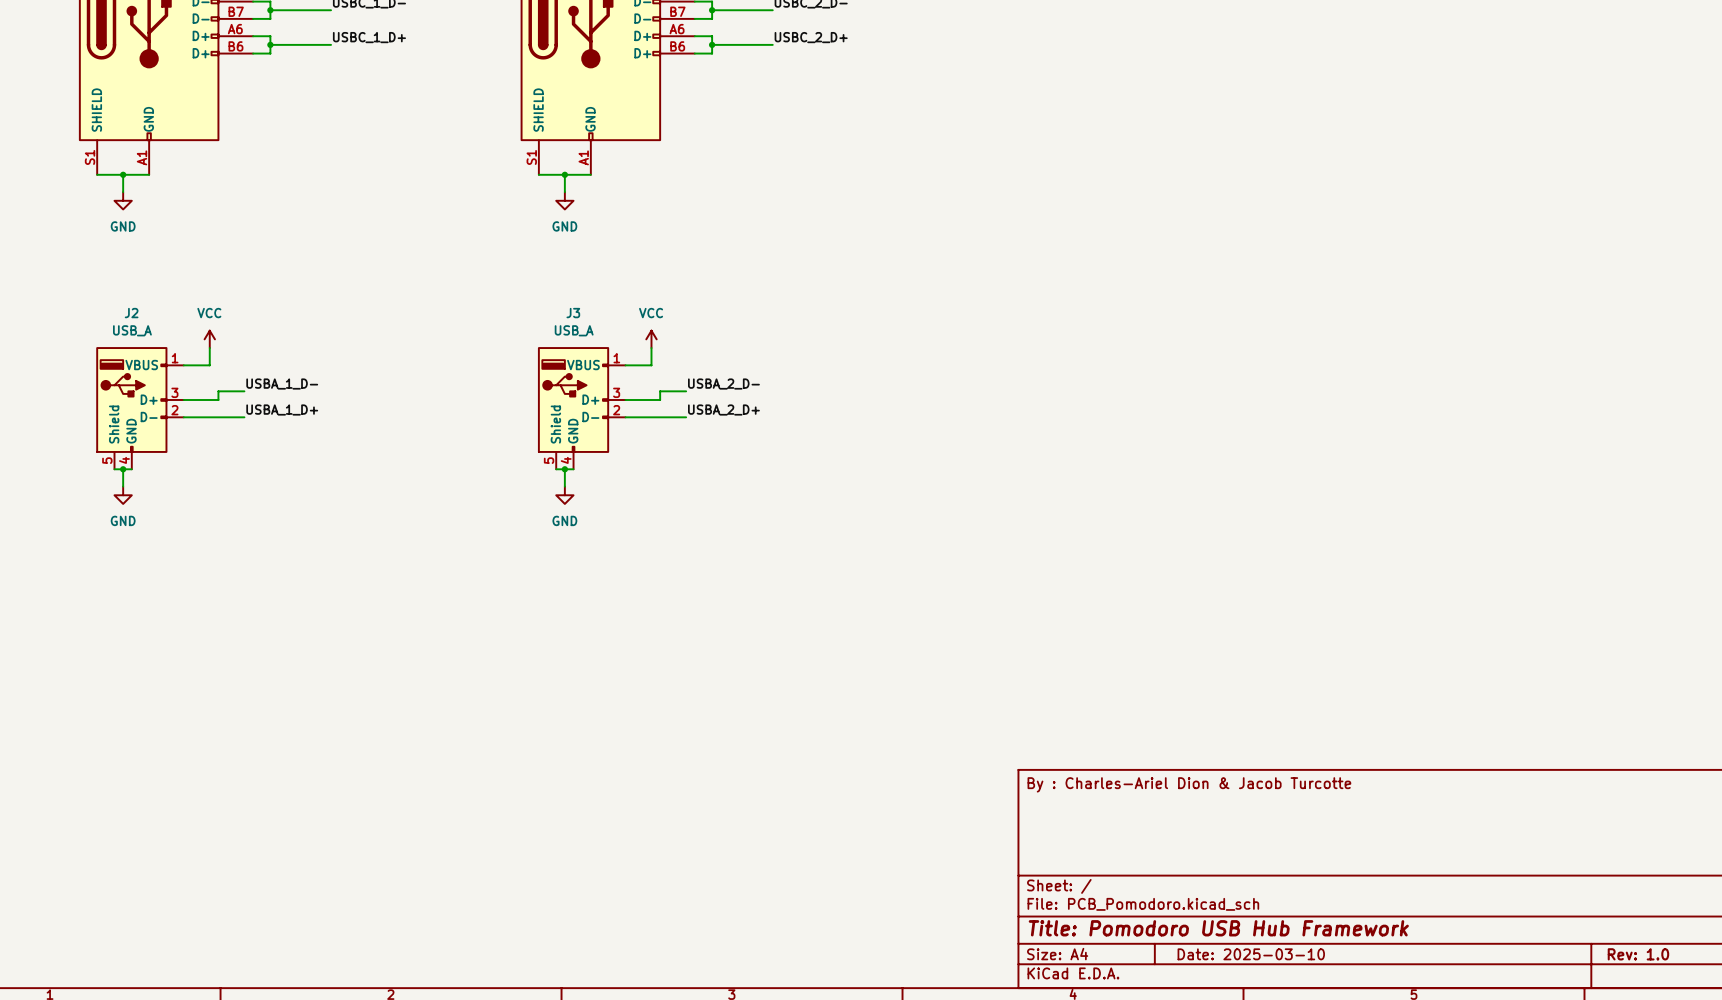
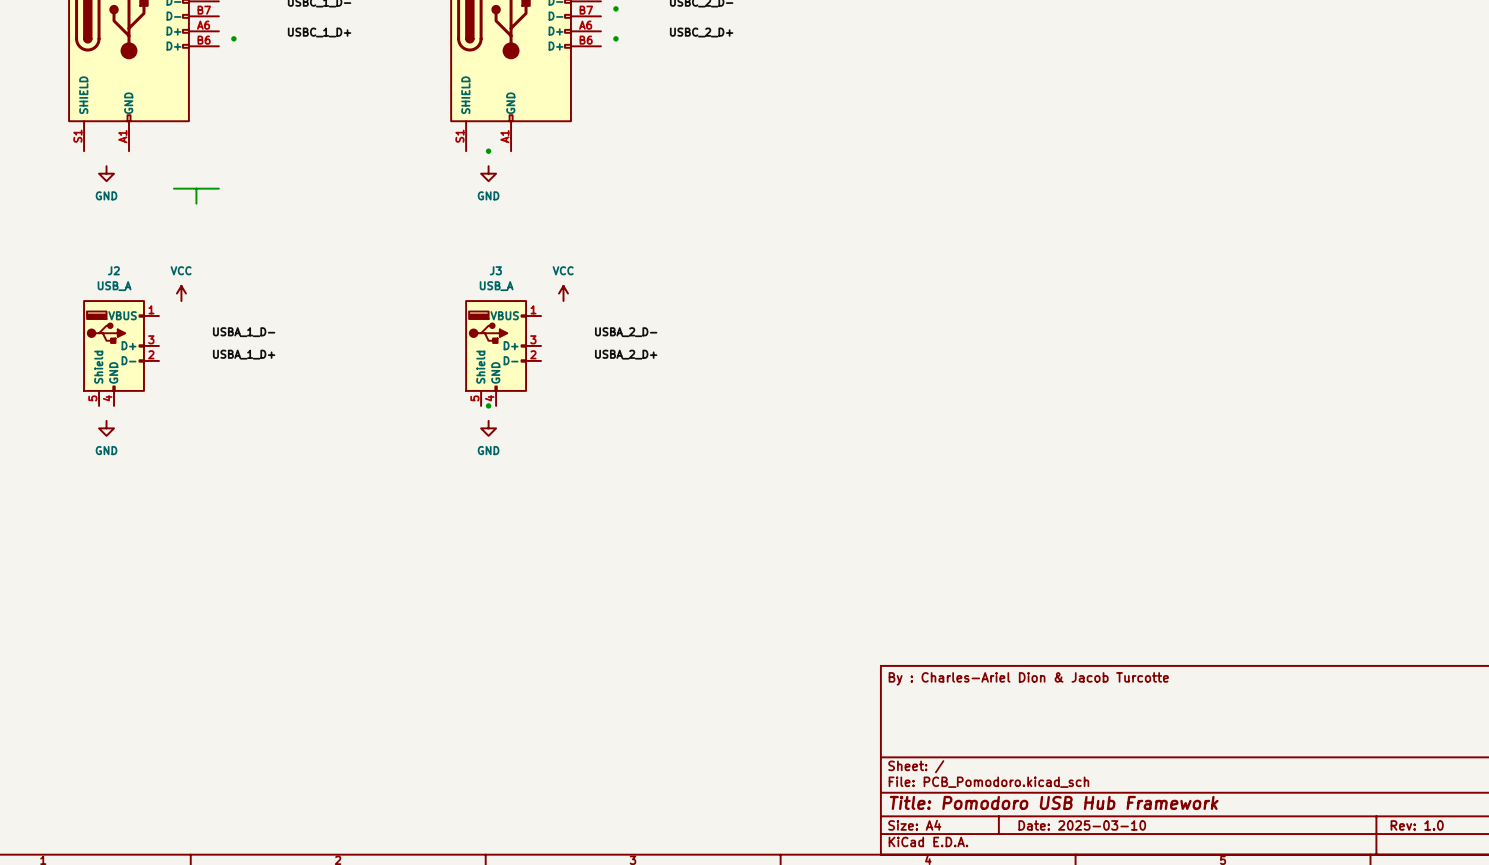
wire: (253, 1) (270, 1) (270, 18) (253, 18) -> none
wire: (694, 1) (712, 1) (712, 18) (694, 18) -> none
wire: (270, 10) (331, 10) -> none
junction: (270, 10) -> none
wire: (712, 10) (772, 10) -> none
wire: (253, 36) (270, 36) (270, 53) (253, 53) -> none
wire: (694, 36) (712, 36) (712, 53) (694, 53) -> none
wire: (270, 44) (331, 44) -> none
wire: (712, 44) (772, 44) -> none
wire: (97, 174) (149, 174) -> (173, 188) (218, 188)
wire: (123, 174) (123, 192) -> (196, 188) (196, 203)
junction: (123, 174) -> none
wire: (538, 174) (590, 174) -> none
wire: (564, 174) (564, 192) -> none
wire: (209, 348) (209, 365) (183, 365) -> none
wire: (651, 348) (651, 365) (625, 365) -> none
wire: (244, 391) (218, 391) (218, 399) (183, 399) -> none
wire: (686, 391) (660, 391) (660, 399) (625, 399) -> none
wire: (183, 417) (244, 417) -> none
wire: (625, 417) (686, 417) -> none
wire: (114, 469) (131, 469) -> none
wire: (123, 469) (123, 486) -> none
junction: (123, 469) -> none
wire: (556, 469) (573, 469) -> none
wire: (564, 469) (564, 486) -> none

